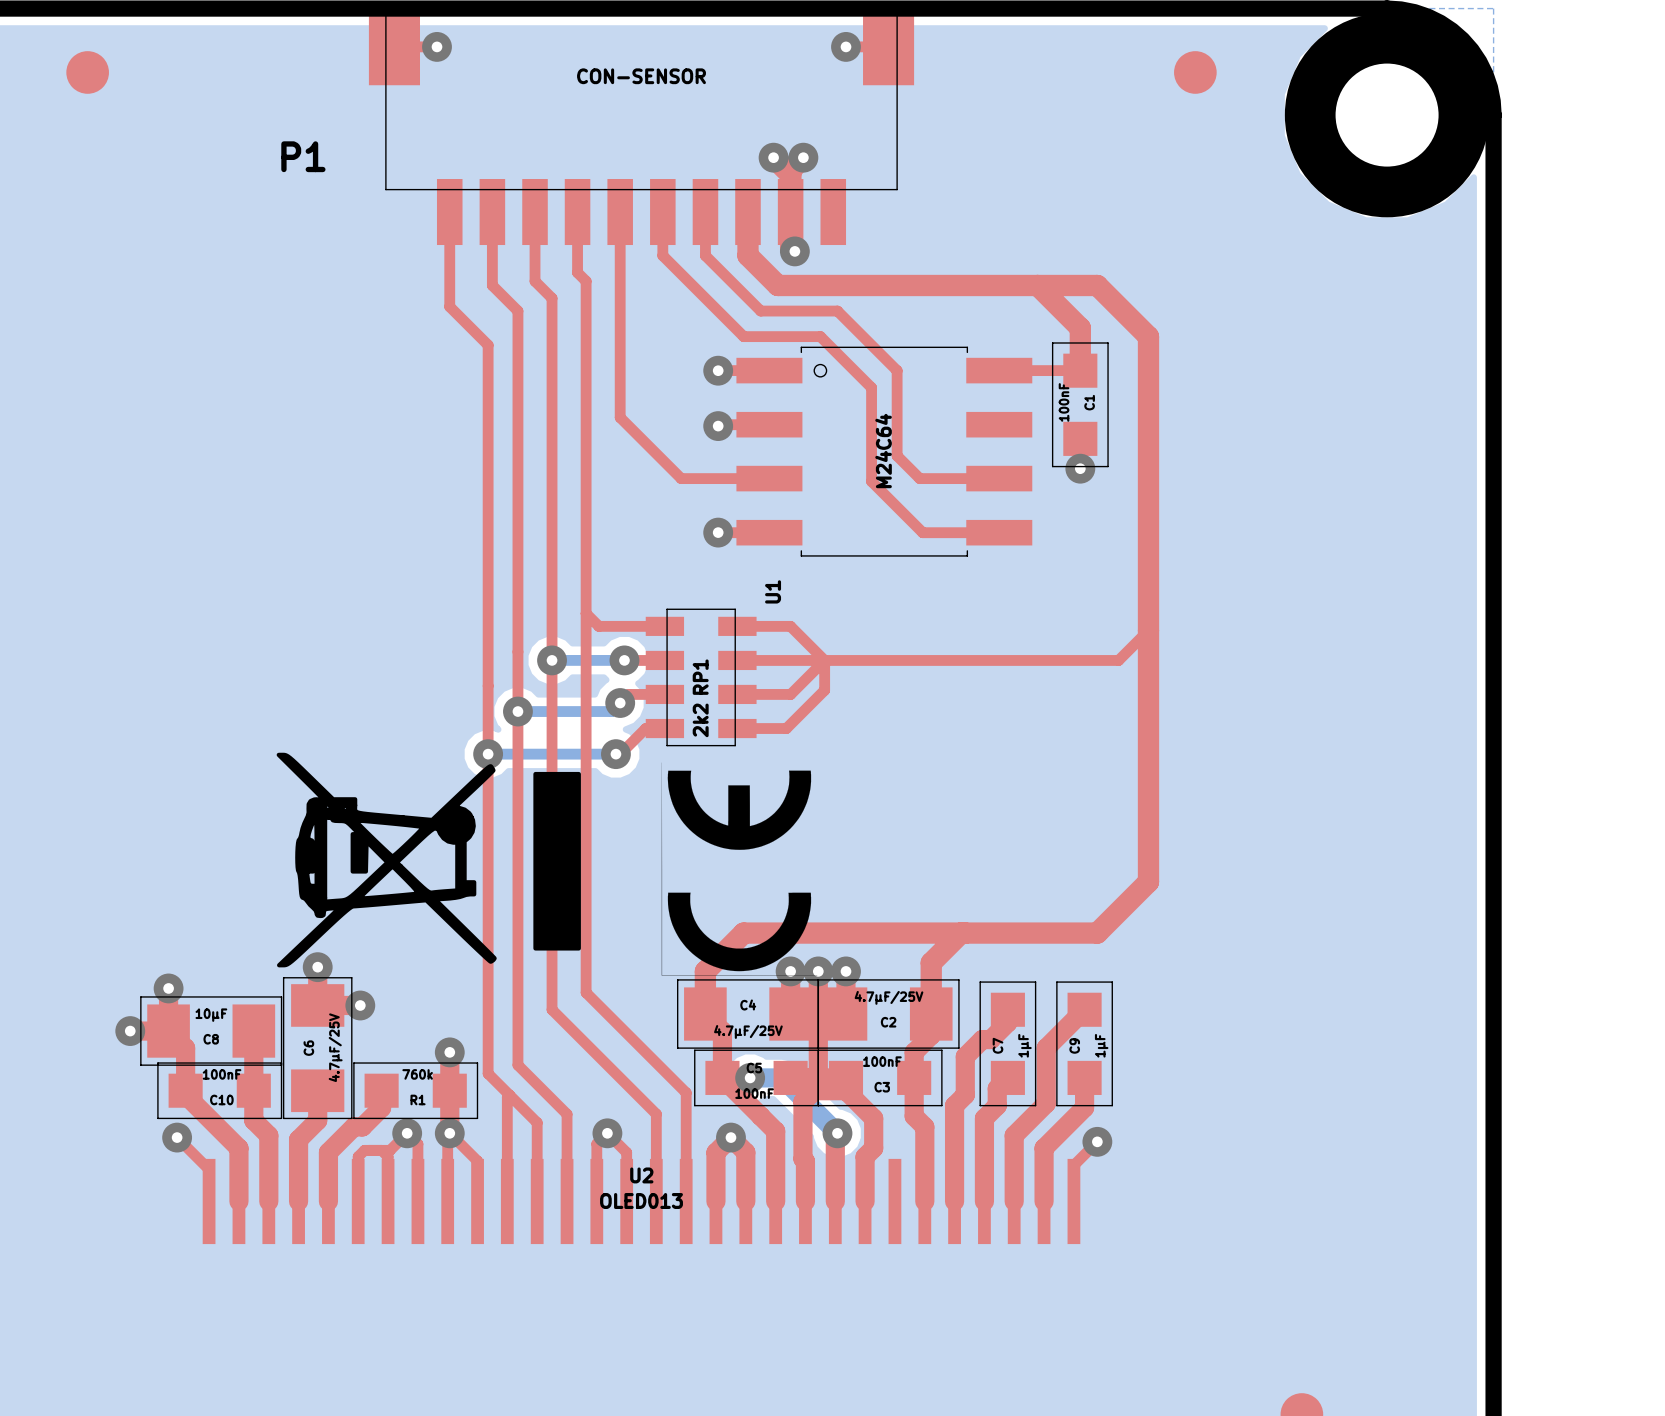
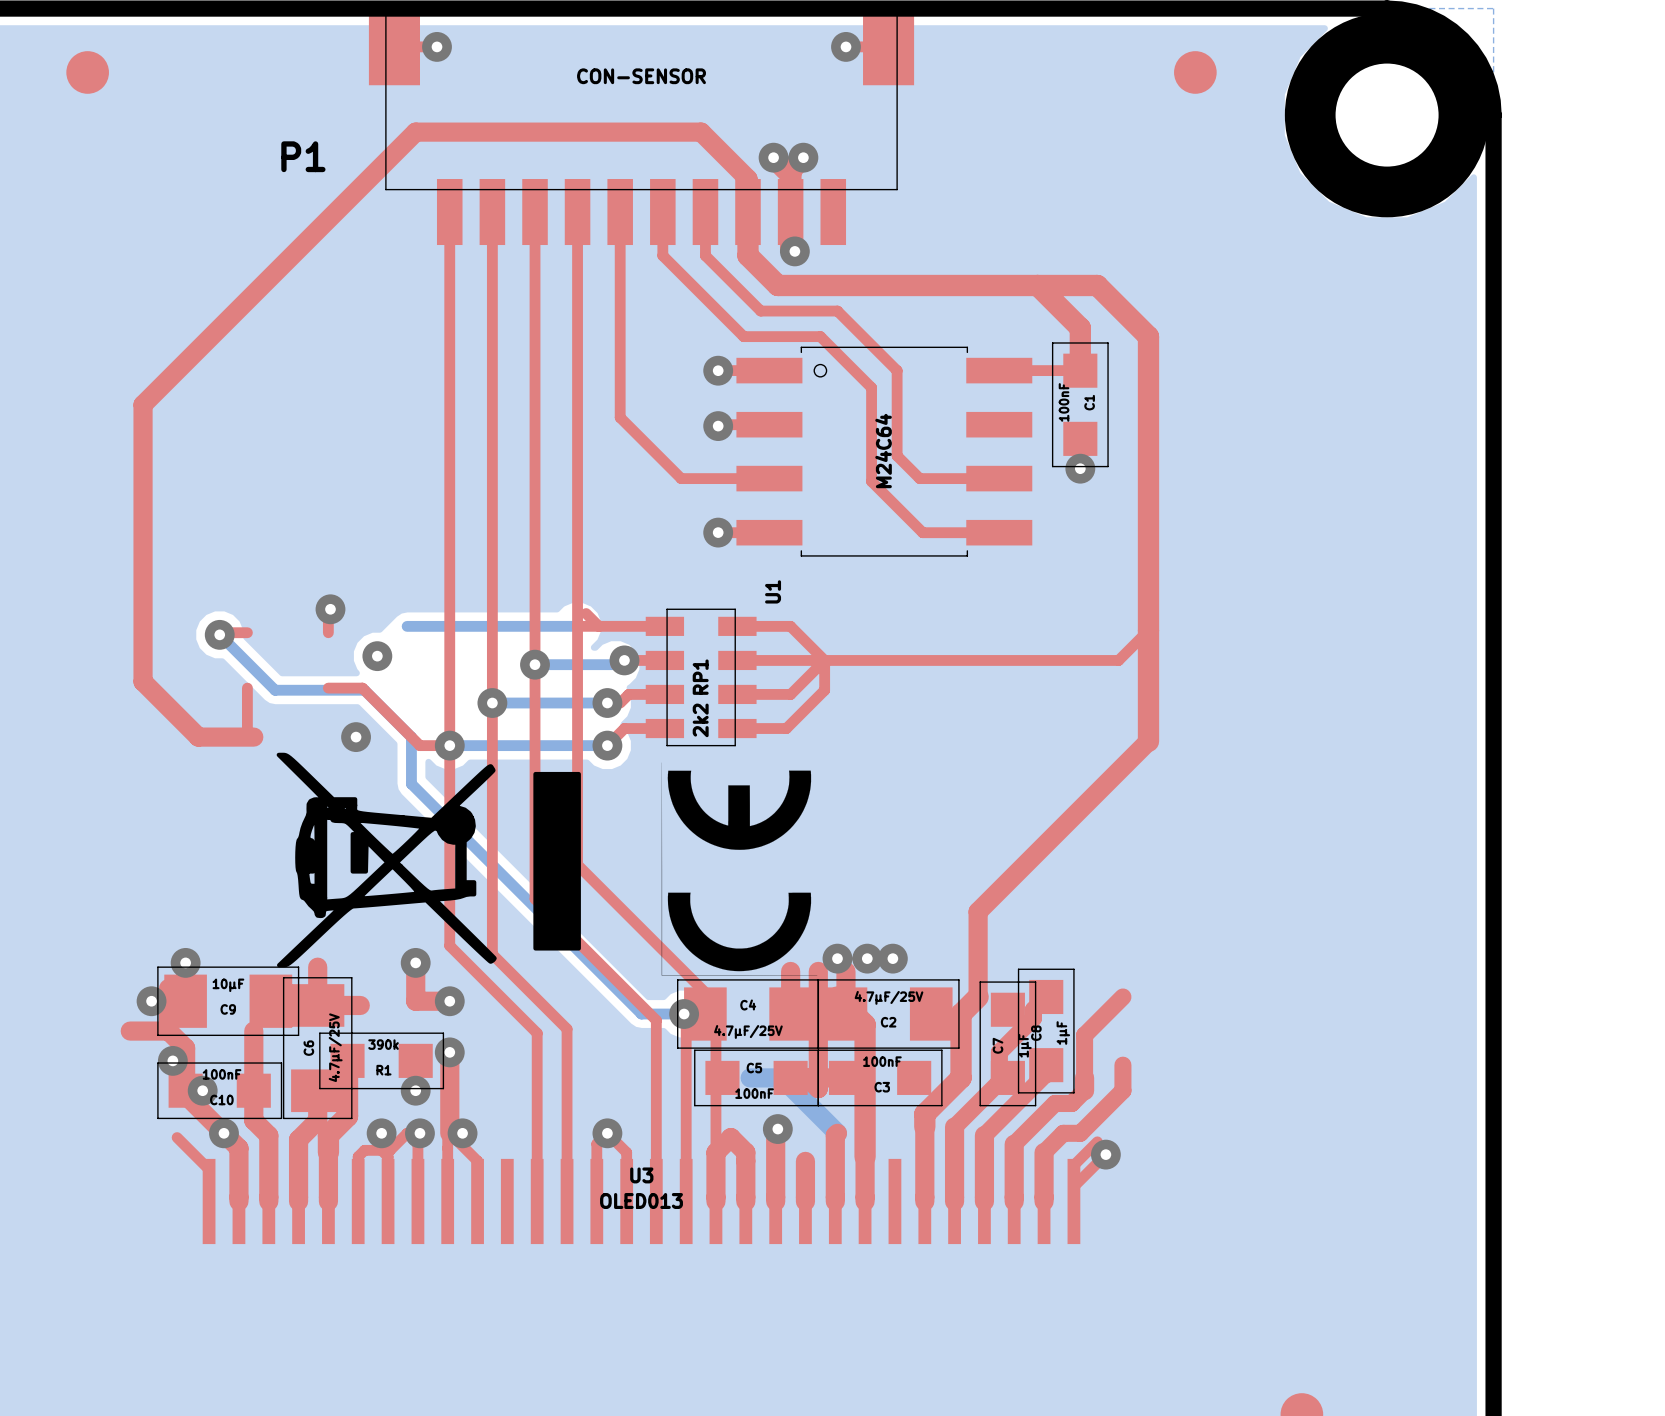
top track: none -> (747, 212) (747, 178) (701, 132) (415, 132) (143, 404) (143, 681) (198, 737) (253, 737) (247, 730) (247, 688)
top track: (577, 272) (586, 281) (586, 992) (686, 1092) -> (577, 272) (577, 864) (715, 1003) (715, 1152)
top track: (535, 281) (552, 298) (552, 1009) (656, 1114) -> (535, 281) (535, 899) (656, 1020) (656, 1114)
top track: (492, 285) (517, 311) (517, 1065) (567, 1114) -> (492, 285) (492, 954) (567, 1029) (567, 1114)
top track: (449, 306) (488, 345) (488, 1073) (537, 1122) -> (449, 306) (449, 945) (537, 1033) (537, 1122)
top track: none -> (330, 609) (328, 611) (328, 632)
via: none -> (330, 609)
bottom track: none -> (407, 626) (577, 626)
top track: (598, 626) (664, 626) -> (577, 626) (664, 626)
top track: none -> (247, 632) (221, 632) (219, 634)
bottom track: none -> (219, 634) (275, 690) (364, 690) (411, 737) (411, 783) (641, 1014) (684, 1014)
via: none -> (219, 634)
via: none -> (377, 656)
bottom track: (552, 660) (624, 660) -> none
via position: (552, 660) -> (534, 664)
bottom track: none -> (534, 664) (615, 664)
top track: none -> (328, 688) (362, 688) (419, 745) (449, 745)
bottom track: none -> (492, 703) (607, 703)
bottom track: (620, 703) (611, 711) (517, 711) -> none
via position: (620, 703) -> (607, 703)
via position: (517, 711) -> (492, 703)
top track: (645, 728) (620, 754) (615, 754) -> (645, 728) (624, 728) (607, 745)
via: none -> (356, 737)
top track: (1148, 741) (1148, 881) (1097, 933) (743, 933) (705, 971) (705, 1014) (722, 1031) (722, 1077) -> (1148, 741) (978, 911) (978, 996) (961, 1014) (961, 1077) (924, 1114) (924, 1126)
bottom track: none -> (449, 745) (607, 745)
via: none -> (449, 745)
bottom track: (488, 754) (615, 754) -> none
via: (488, 754) -> none
via position: (615, 754) -> (607, 745)
top track: (961, 933) (931, 962) (931, 1035) (914, 1052) (914, 1116) (924, 1126) -> none
via: none -> (837, 958)
via: none -> (867, 958)
via: none -> (892, 958)
via: none -> (185, 962)
top track: none -> (415, 962) (415, 1001) (449, 1001)
via: none -> (415, 962)
via: (317, 967) -> none
via: (790, 971) -> none
via: (818, 971) -> none
via: (846, 971) -> none
C9 footprint: [1056, 982, 1113, 1106] -> [157, 967, 299, 1036]
via: (168, 988) -> none
C8 footprint: [140, 996, 282, 1066] -> [1018, 969, 1074, 1093]
top track: none -> (1122, 996) (1084, 1035) (1084, 1077)
via: none -> (151, 1001)
via: none -> (449, 1001)
via: (360, 1005) -> none
top track: (1007, 1009) (1007, 1022) (990, 1039) (982, 1039) (965, 1056) (965, 1094) (954, 1105) (954, 1127) -> (1046, 996) (1033, 1009) (1033, 1018) (999, 1052) (999, 1082) (954, 1127)
top track: (1084, 1009) (1046, 1048) (1046, 1065) -> none
top track: none -> (684, 1014) (686, 1016) (686, 1092)
via: none -> (684, 1014)
C8 value: 10µF (211, 1015) -> 1µF (1063, 1032)
via: (130, 1031) -> none
C9 value: 1µF (1101, 1045) -> 10µF (228, 985)
via: none -> (172, 1060)
top track: none -> (1122, 1065) (1122, 1090) (1080, 1133) (1063, 1133) (1044, 1152)
top track: (1046, 1073) (1046, 1103) (1014, 1135) (1014, 1144) -> (1046, 1073) (984, 1135)
R1 value: 760k (417, 1074) -> 390k (383, 1044)
top track: (722, 1077) (775, 1131) -> none
via: (750, 1077) -> none
top track: (1007, 1077) (997, 1088) (997, 1105) (984, 1118) (984, 1135) -> none
top track: (818, 1086) (802, 1101) (802, 1158) (805, 1161) -> none
via: none -> (202, 1090)
top track: (381, 1090) (381, 1107) (362, 1126) (353, 1126) (328, 1152) -> (347, 1060) (347, 1116) (328, 1135) (328, 1152)
R1 position: (415, 1090) -> (381, 1060)
via: none -> (415, 1090)
top track: (814, 1090) (846, 1090) (873, 1118) (873, 1148) (865, 1156) -> (837, 996) (865, 1024) (865, 1156)
top track: (1084, 1090) (1084, 1107) (1044, 1148) (1044, 1152) -> (1084, 1090) (1071, 1103) (1054, 1103) (1014, 1144)
top track: (509, 1094) (507, 1097) (507, 1201) -> none
via: none -> (777, 1129)
via: none -> (223, 1133)
via: none -> (381, 1133)
via: (407, 1133) -> none
via: none -> (419, 1133)
via position: (449, 1133) -> (462, 1133)
via: (837, 1133) -> none
via: (177, 1137) -> none
via: (730, 1137) -> none
via position: (1097, 1141) -> (1105, 1154)
top track: none -> (1105, 1154) (1073, 1186)
U2 name: U2 (641, 1175) -> U3 (641, 1175)

